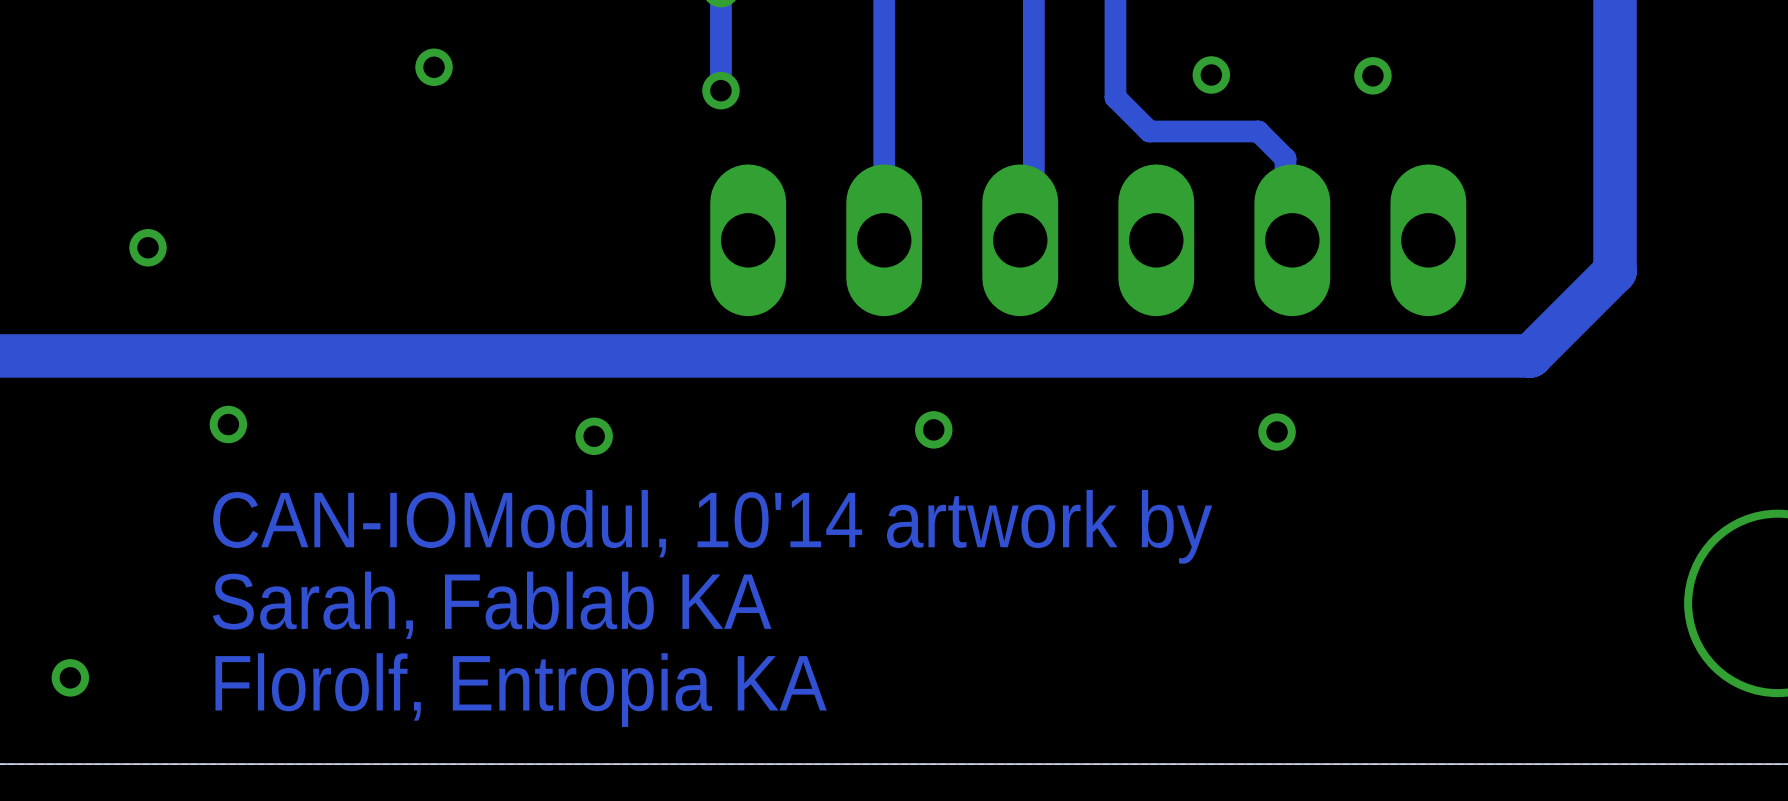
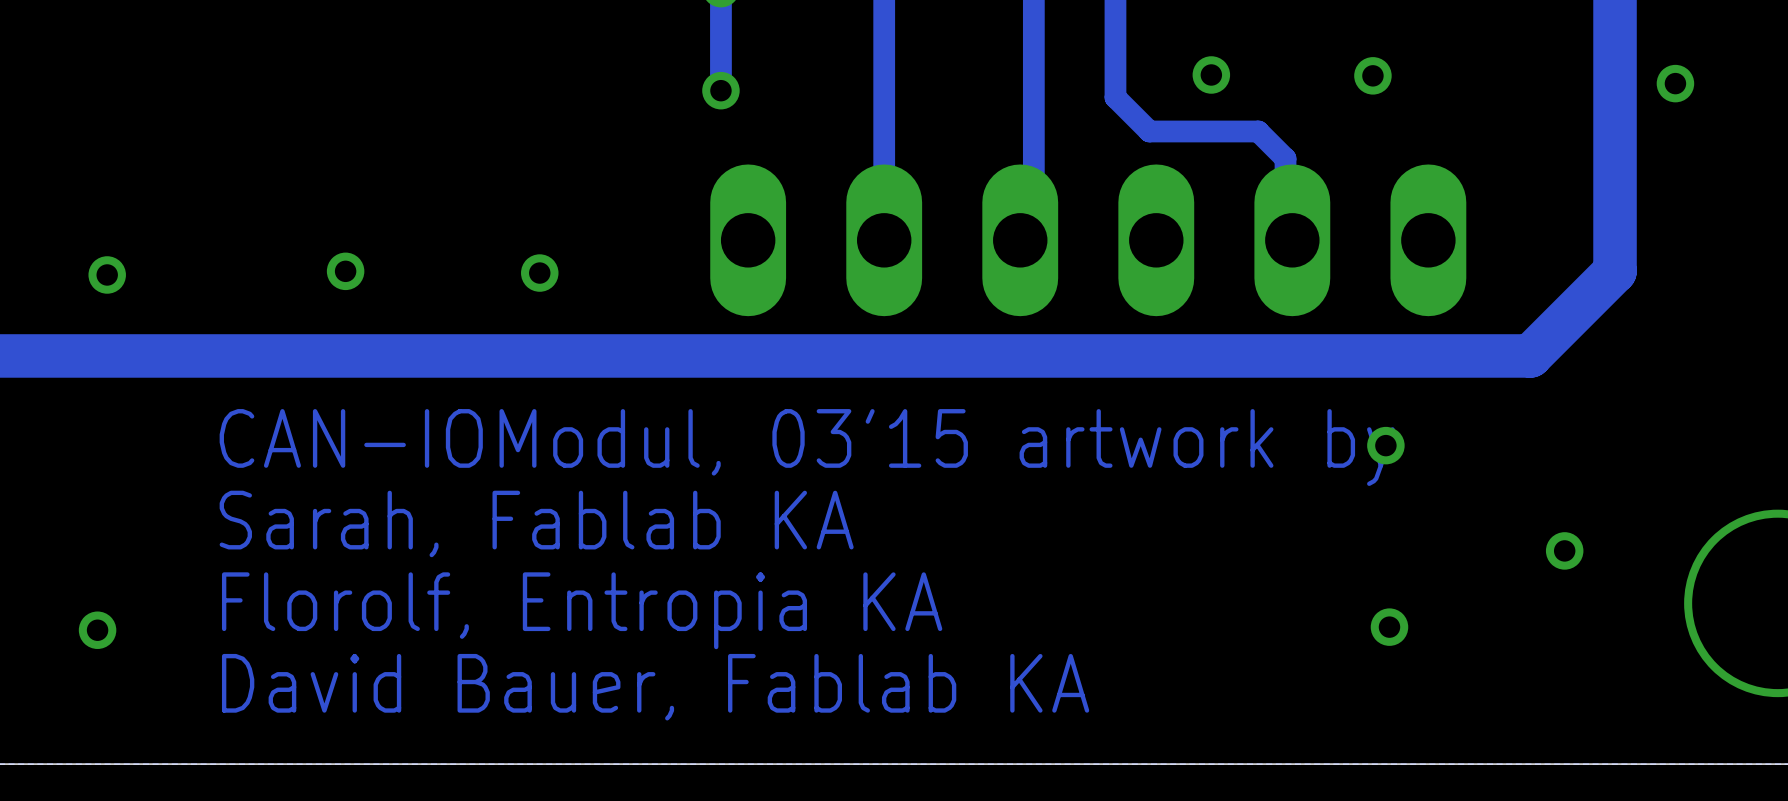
via: (434, 67) -> none
via: none -> (1675, 83)
via position: (148, 247) -> (107, 274)
via: none -> (345, 271)
via: none -> (539, 273)
via: (228, 424) -> none
via: (933, 429) -> none
via position: (1277, 432) -> (1385, 445)
via: (594, 436) -> none
text: none -> CAN-IOModul, 03'15 artwork by (807, 447)
text: CAN-IOModul, 10'14 artwork by (712, 526) -> Sarah, Fablab KA (536, 523)
via: none -> (1564, 550)
text: Sarah, Fablab KA (492, 605) -> Florolf, Entropia KA (582, 610)
via: none -> (1389, 627)
via position: (70, 677) -> (97, 630)
text: Florolf, Entropia KA (521, 690) -> David Bauer, Fablab KA (655, 687)

